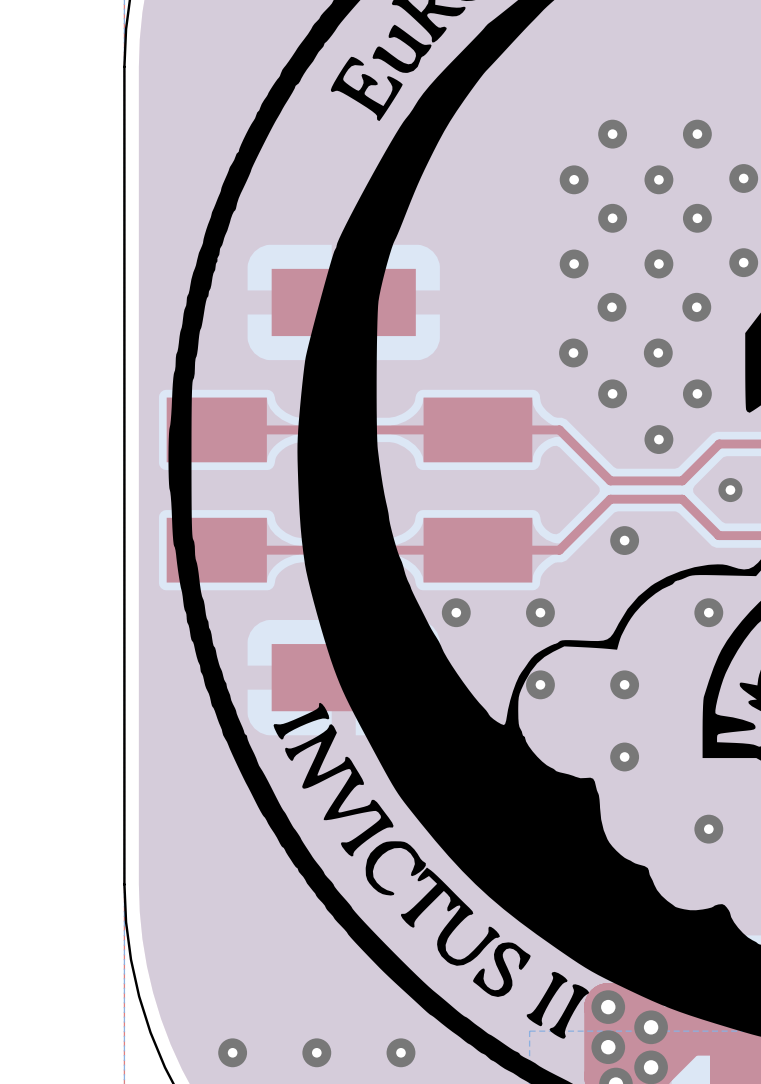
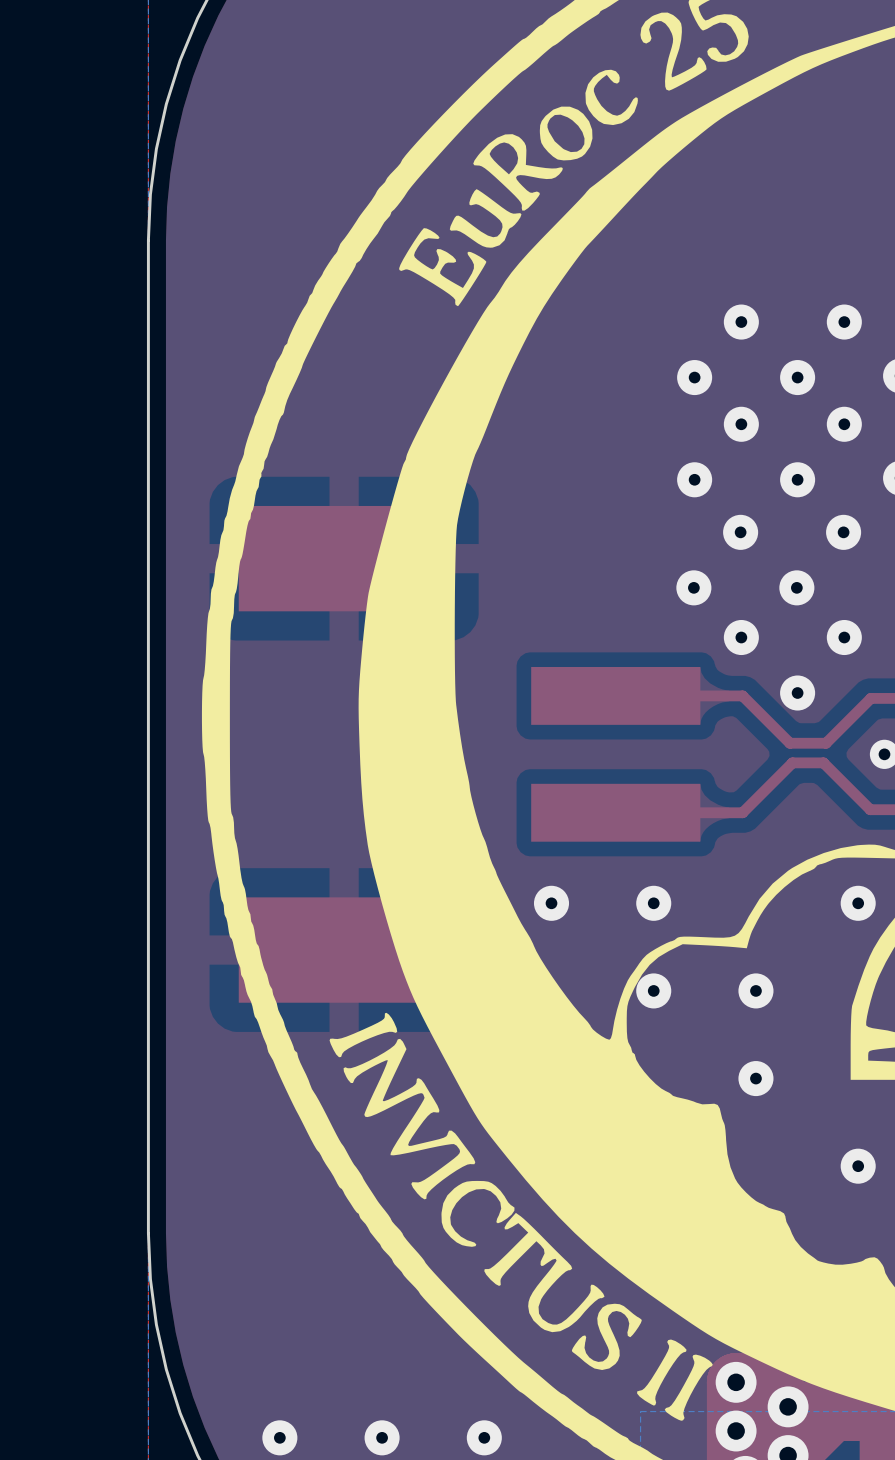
part footprint: [166, 268, 533, 712] -> [238, 505, 701, 1003]
top track: (216, 429) (559, 429) (610, 480) (652, 480) -> (615, 695) (742, 695) (789, 743)
top track: (682, 499) (610, 499) (559, 550) (216, 550) -> (826, 765) (823, 762) (792, 762) (742, 812) (615, 812)
via: (624, 540) -> none

